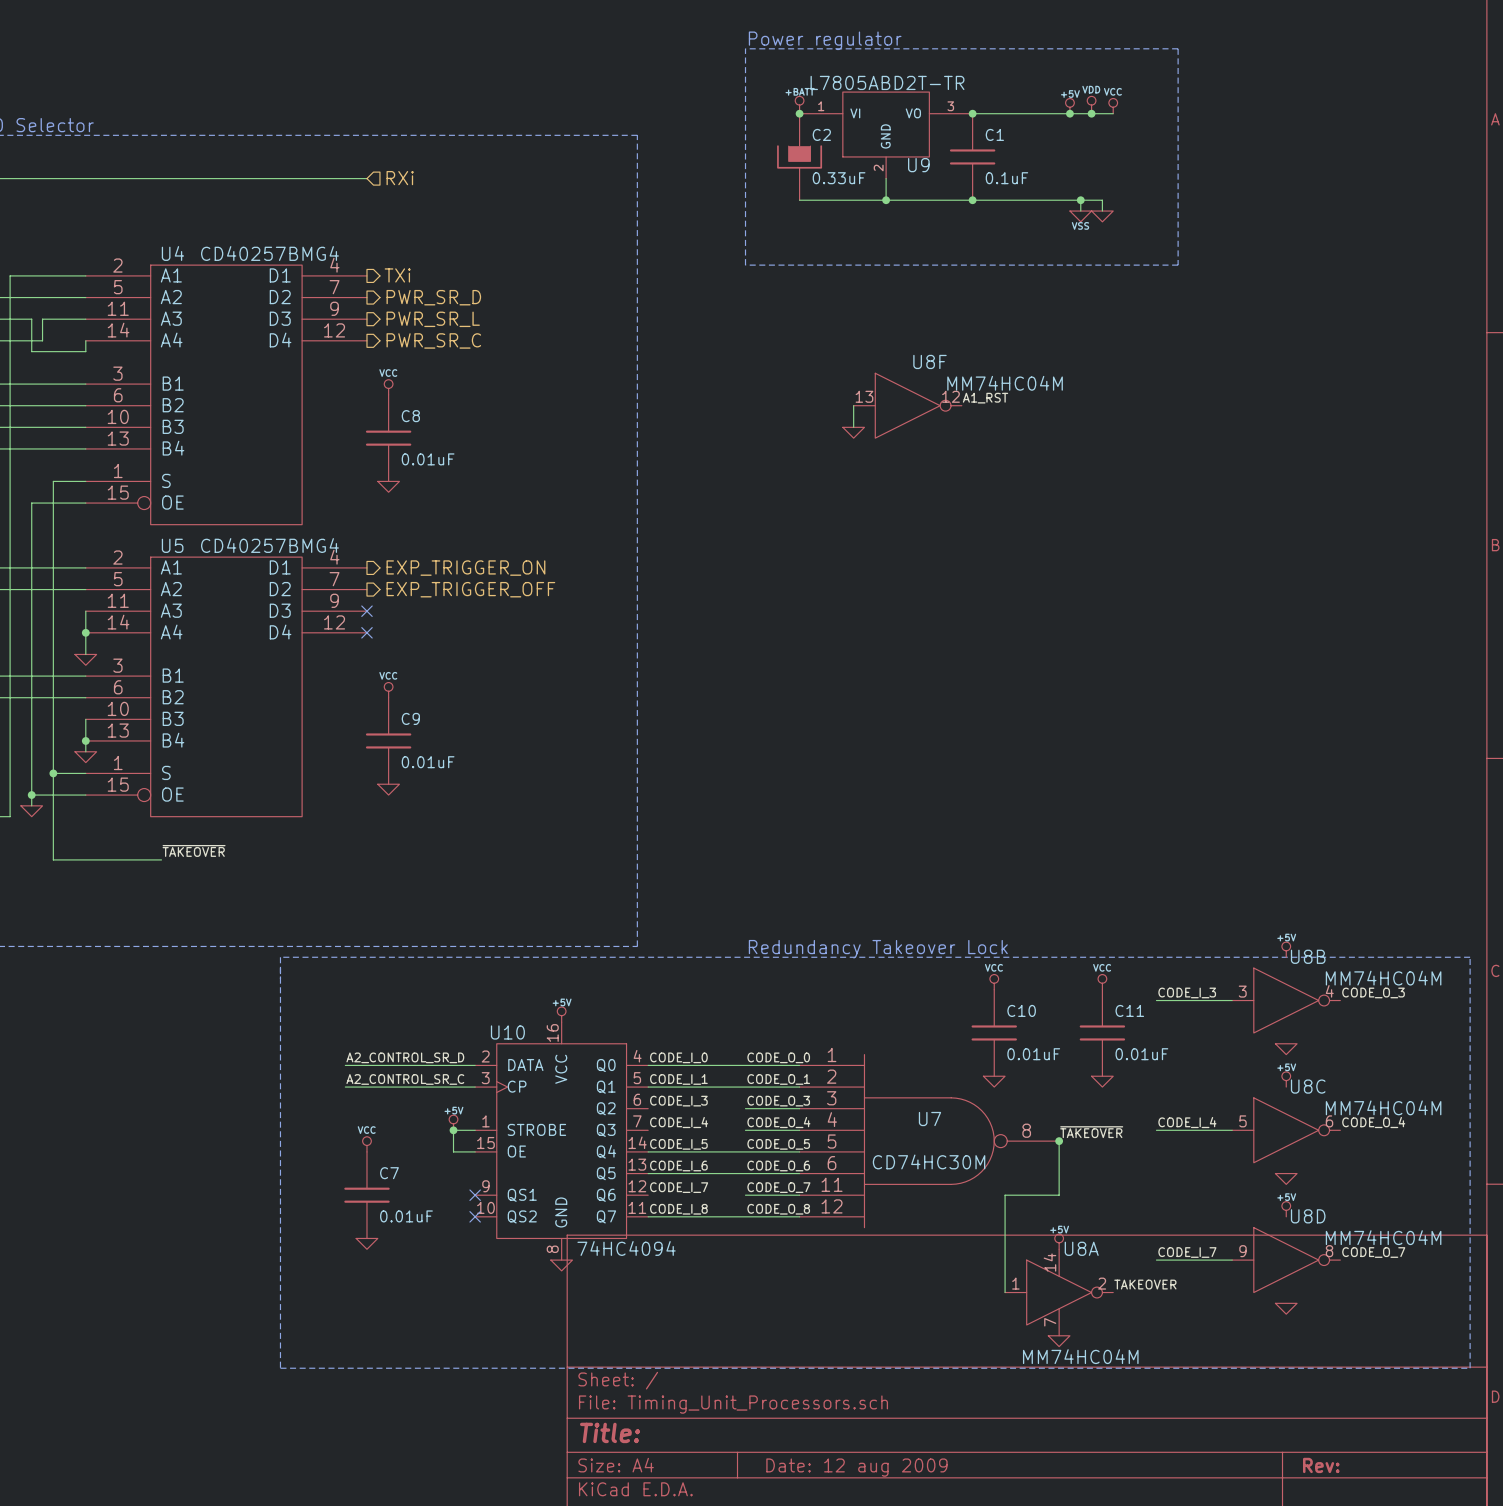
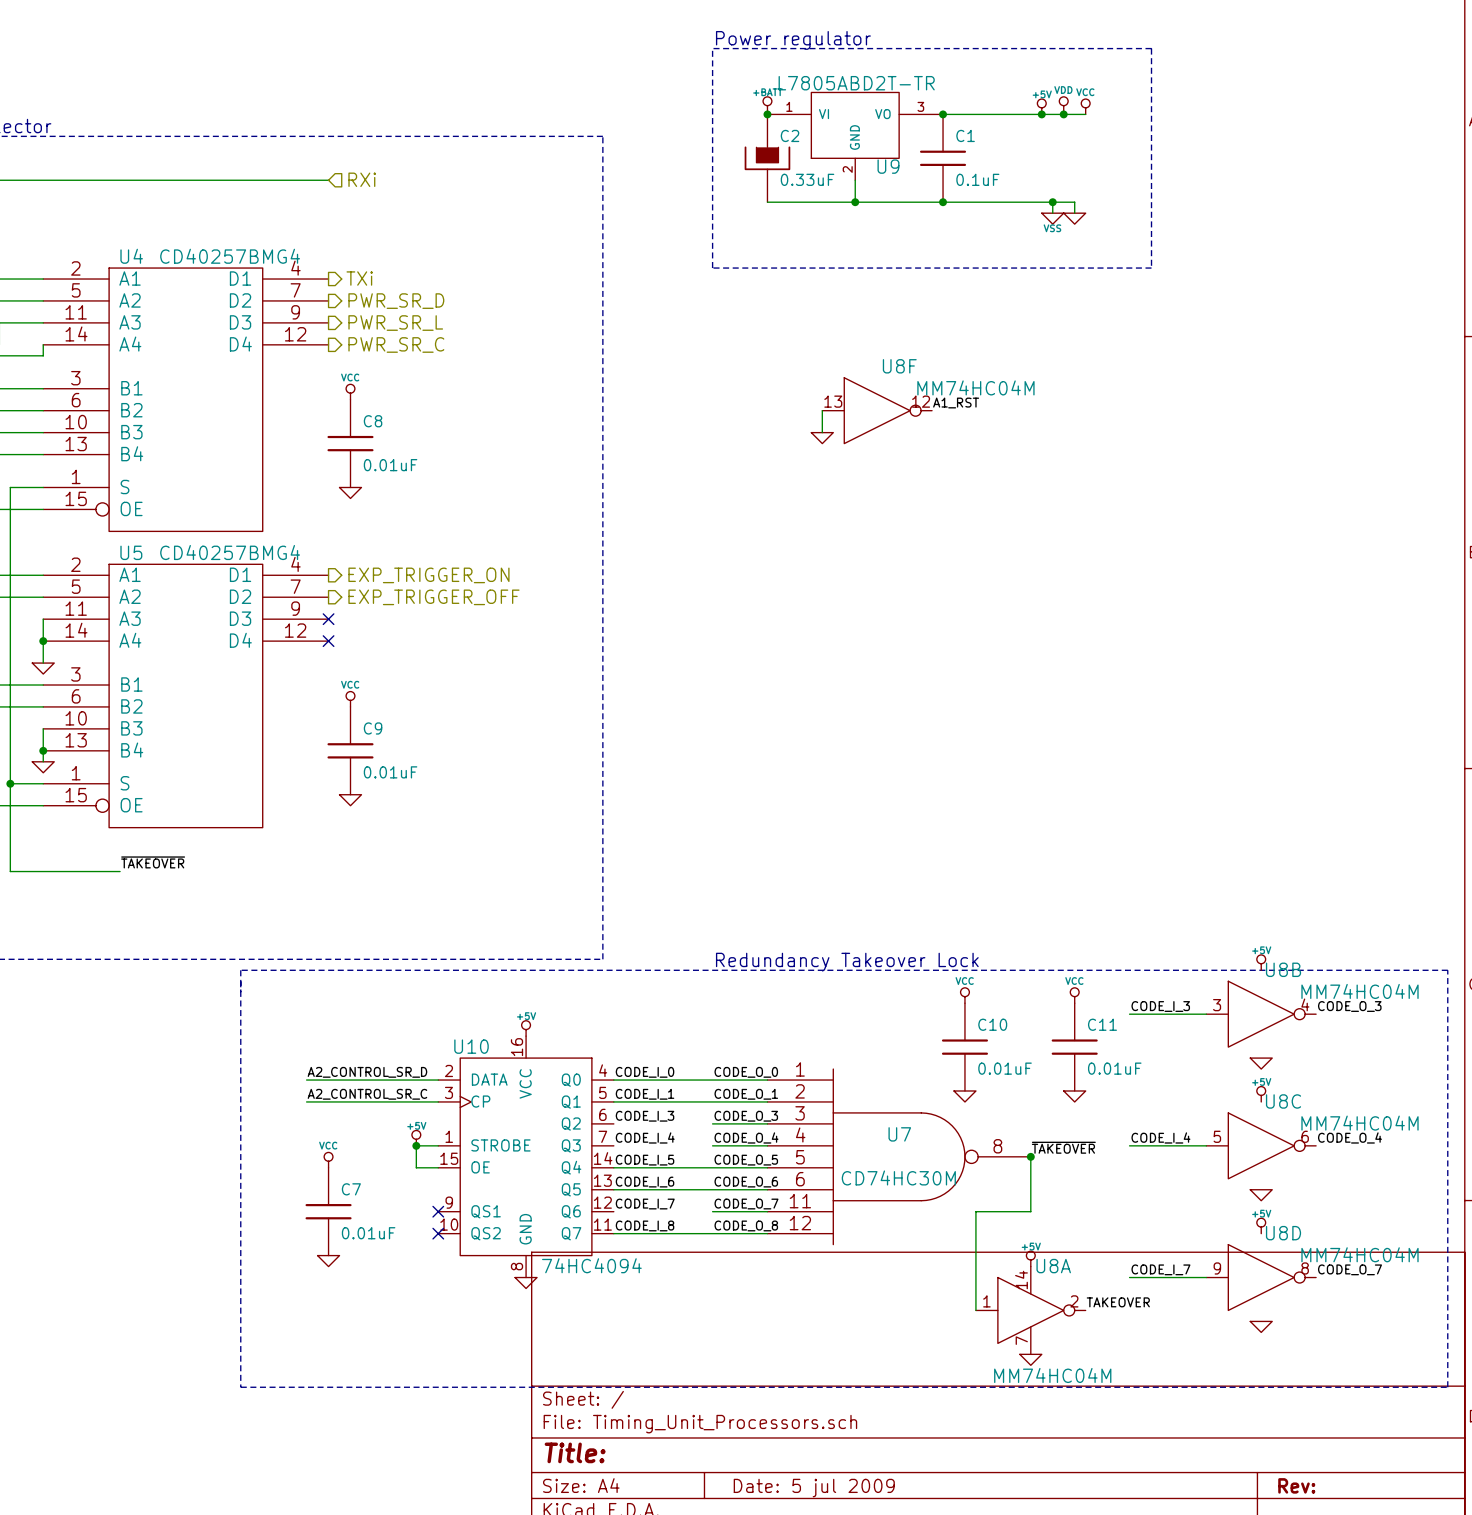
title block: Date: 12 aug 2009 (856, 1467) -> Date: 5 jul 2009 (814, 1488)

